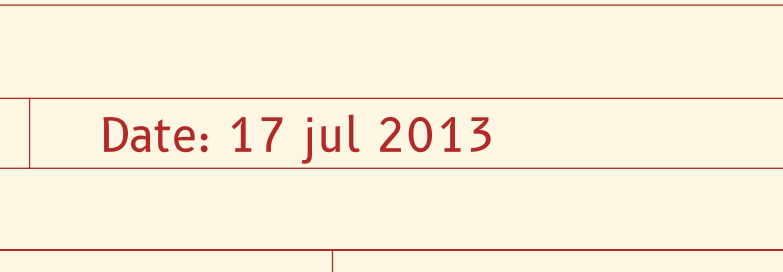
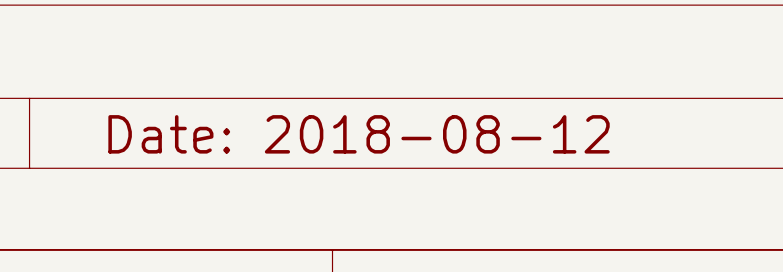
title block: Date: 17 jul 2013 (297, 139) -> Date: 2018-08-12 (359, 134)

